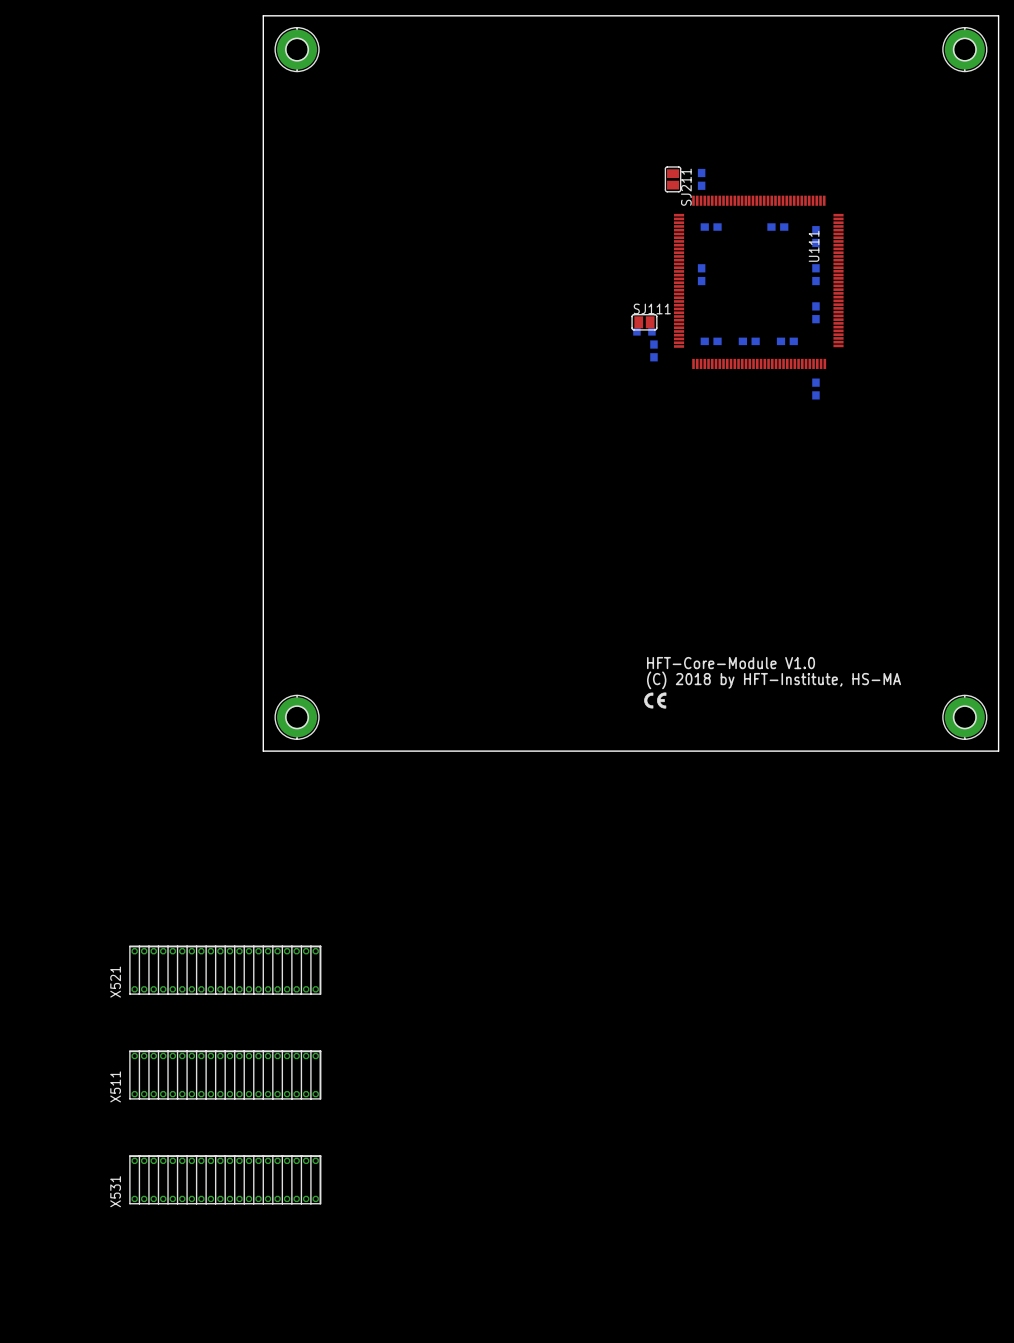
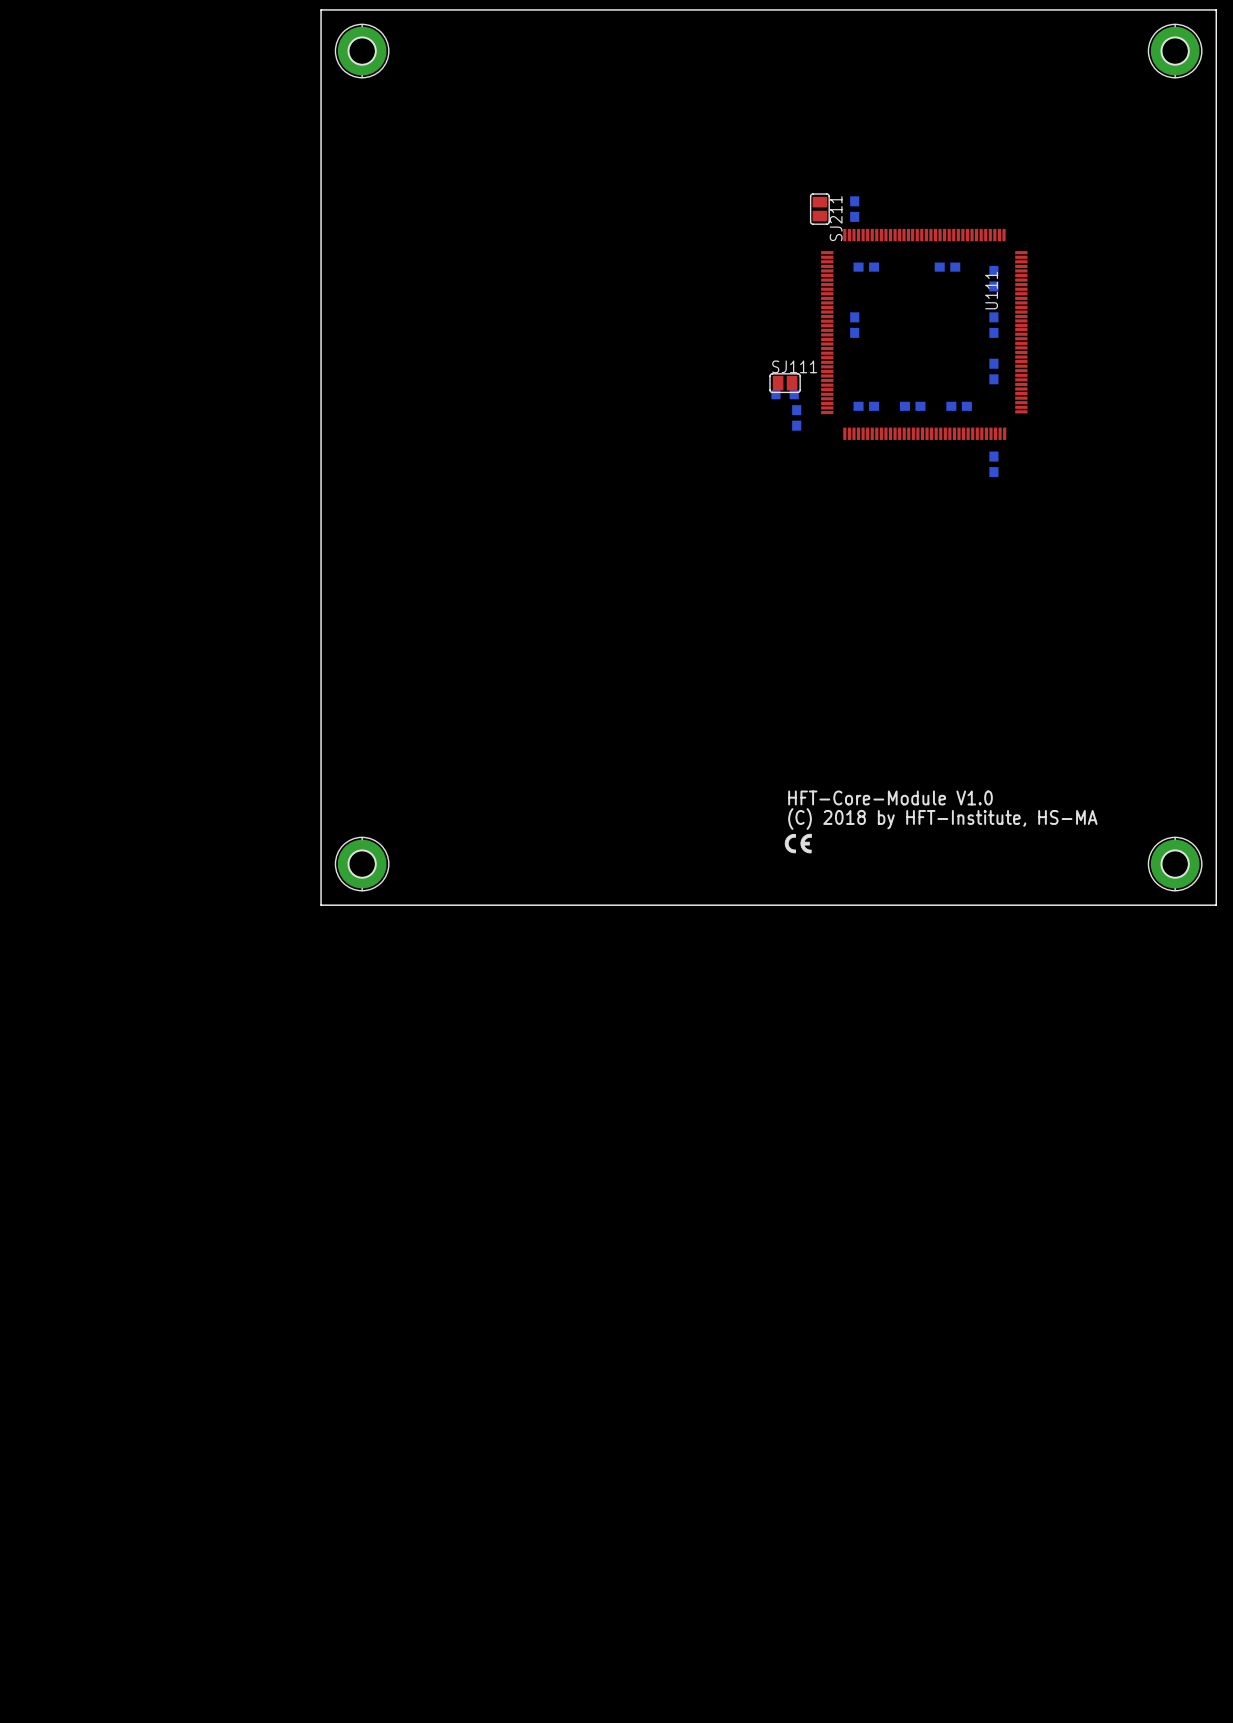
X521: (225, 970) -> none
X511: (225, 1075) -> none
X531: (225, 1179) -> none

